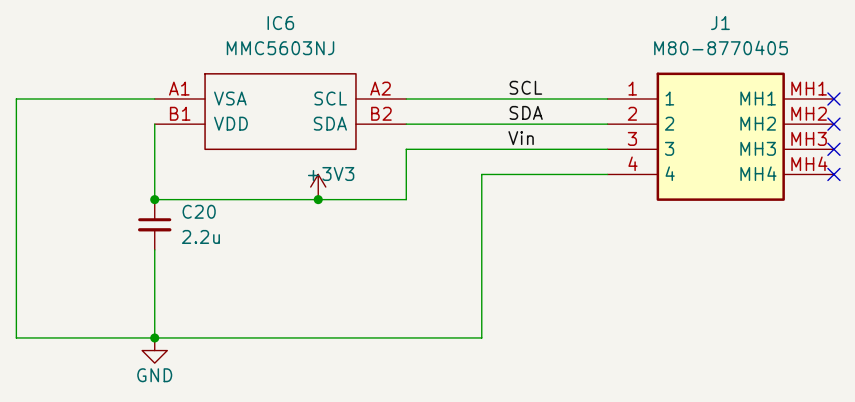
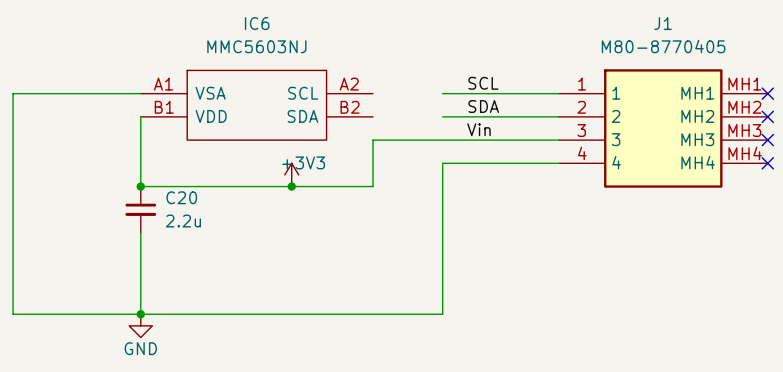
wire: (406, 98) (481, 98) -> none
wire: (406, 124) (481, 124) -> none

